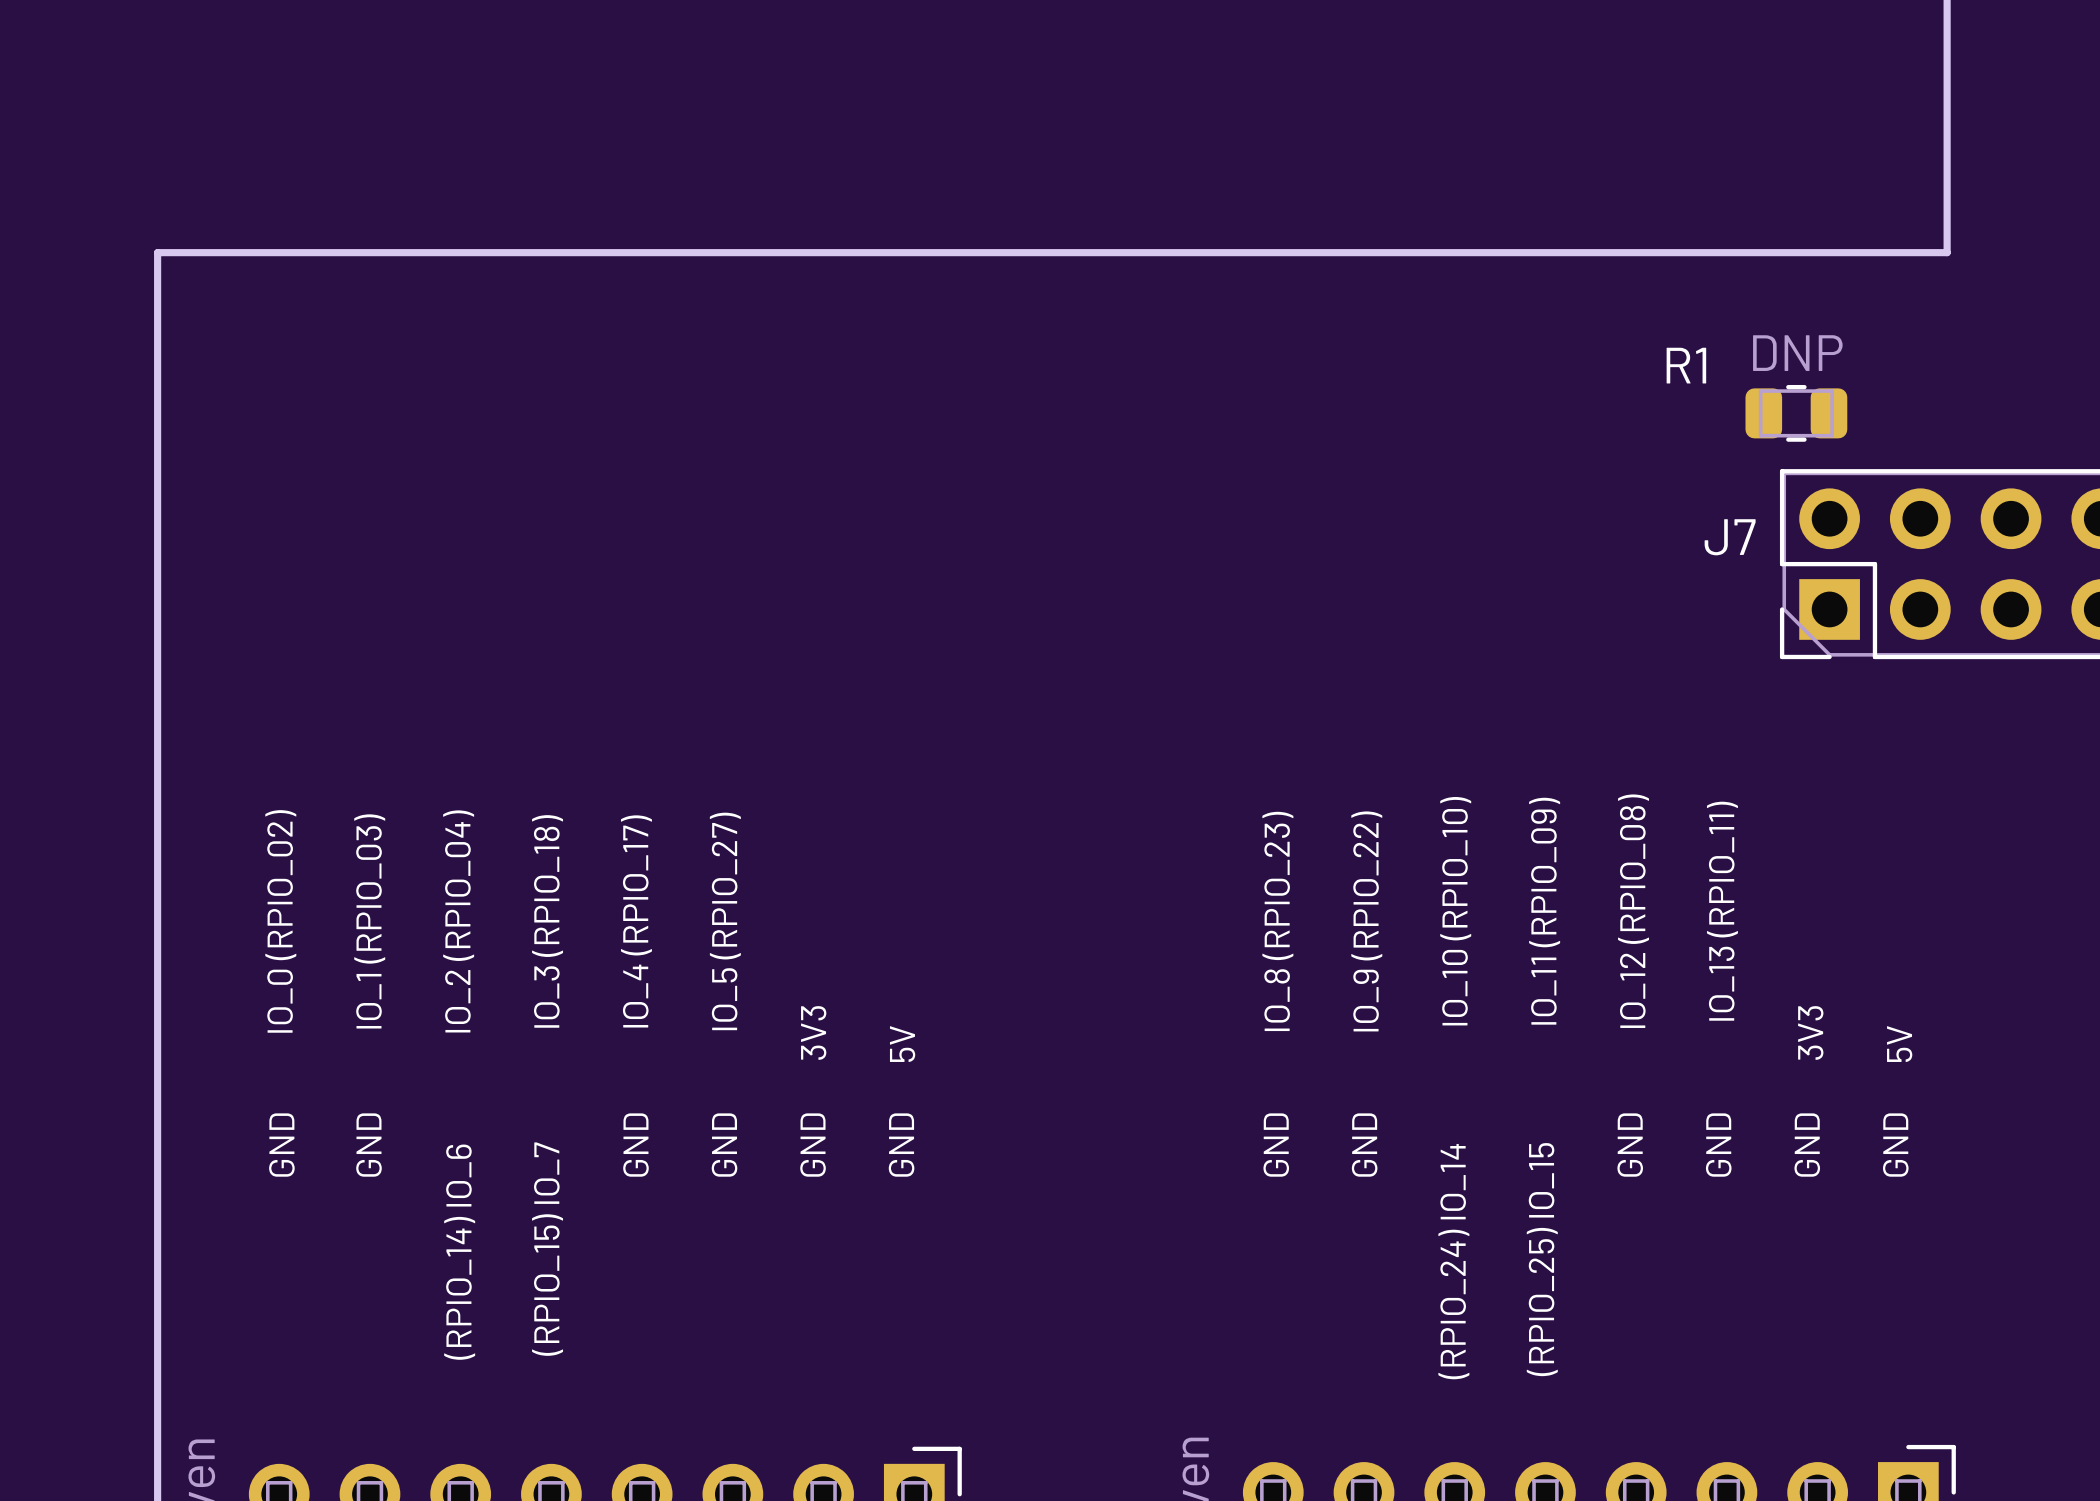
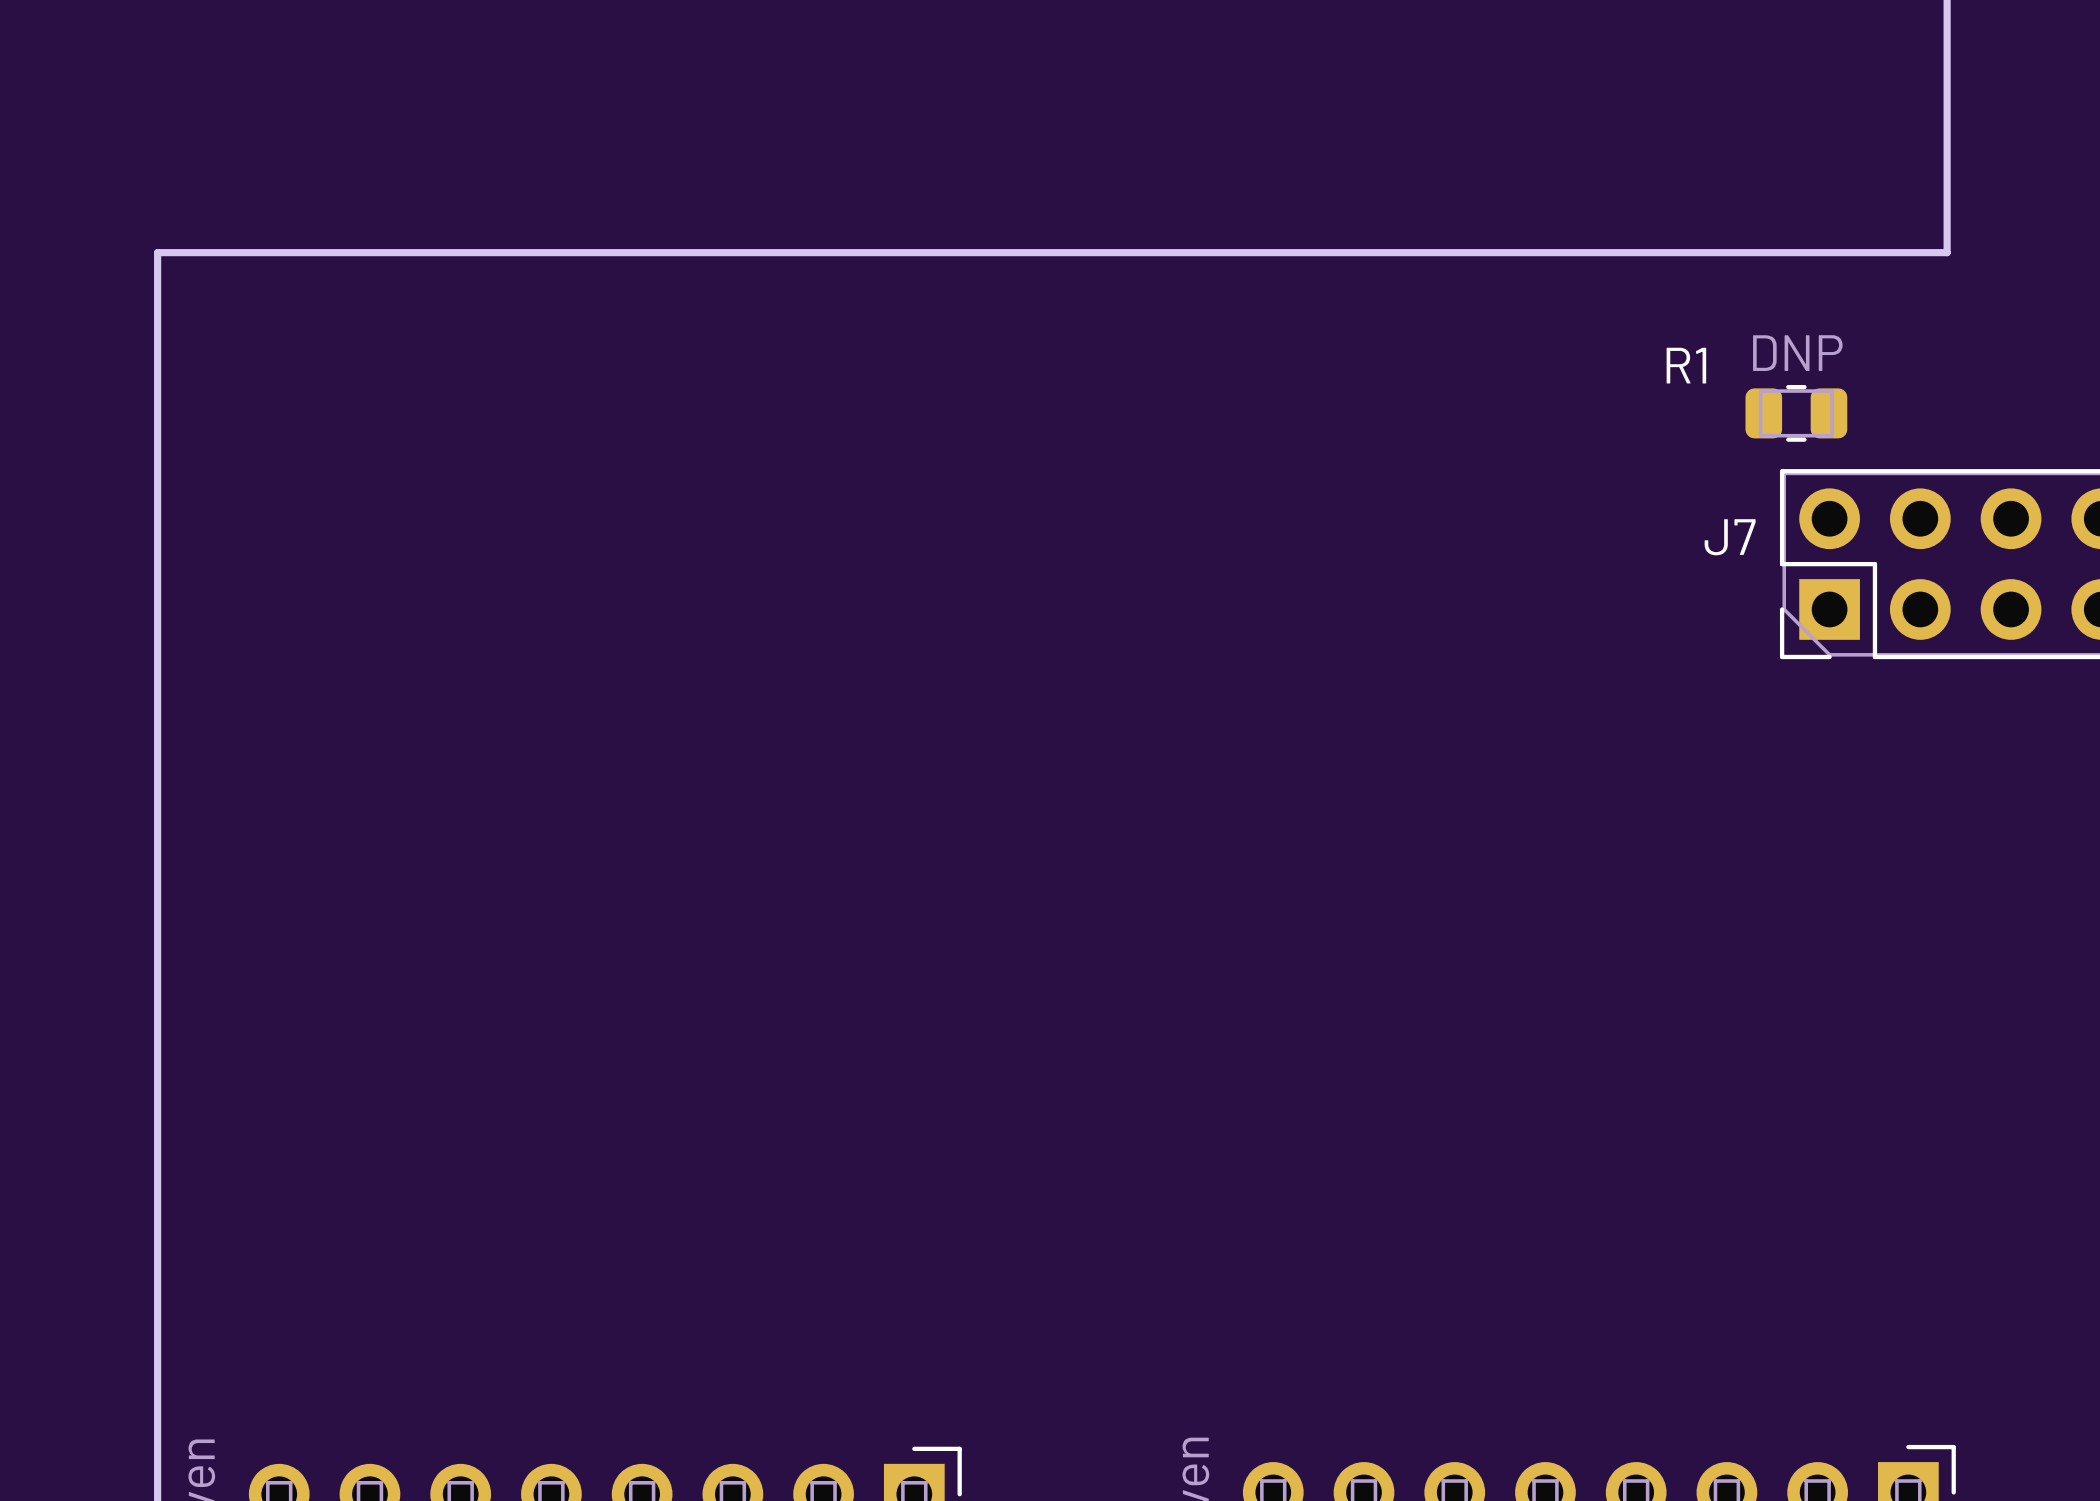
text: IO_10 (RPIO_10) (1455, 911) -> none
text: IO_11 (RPIO_09) (1544, 911) -> none
text: IO_12 (RPIO_08) (1633, 911) -> none
text: IO_13 (RPIO_11) (1722, 911) -> none
text: IO_0 (RPIO_02) (280, 921) -> none
text: IO_1 (RPIO_03) (369, 921) -> none
text: IO_2 (RPIO_04) (458, 921) -> none
text: IO_3 (RPIO_18) (547, 921) -> none
text: IO_4 (RPIO_17) (636, 921) -> none
text: IO_5 (RPIO_27) (725, 921) -> none
text: IO_8 (RPIO_23) (1277, 921) -> none
text: IO_9 (RPIO_22) (1366, 921) -> none
text: 3V3 (813, 1032) -> none
text: 3V3 (1810, 1032) -> none
text: 5V (902, 1044) -> none
text: 5V (1899, 1044) -> none
text: GND (281, 1145) -> none
text: GND (368, 1145) -> none
text: GND (635, 1145) -> none
text: GND (724, 1145) -> none
text: GND (813, 1145) -> none
text: GND (901, 1145) -> none
text: GND (1276, 1145) -> none
text: GND (1364, 1145) -> none
text: GND (1630, 1145) -> none
text: GND (1718, 1145) -> none
text: GND (1807, 1145) -> none
text: GND (1895, 1145) -> none
text: (RPIO_15) IO_7 (547, 1249) -> none
text: (RPIO_14) IO_6 (459, 1252) -> none
text: (RPIO_25) IO_15 (1542, 1259) -> none
text: (RPIO_24) IO_14 (1453, 1261) -> none

